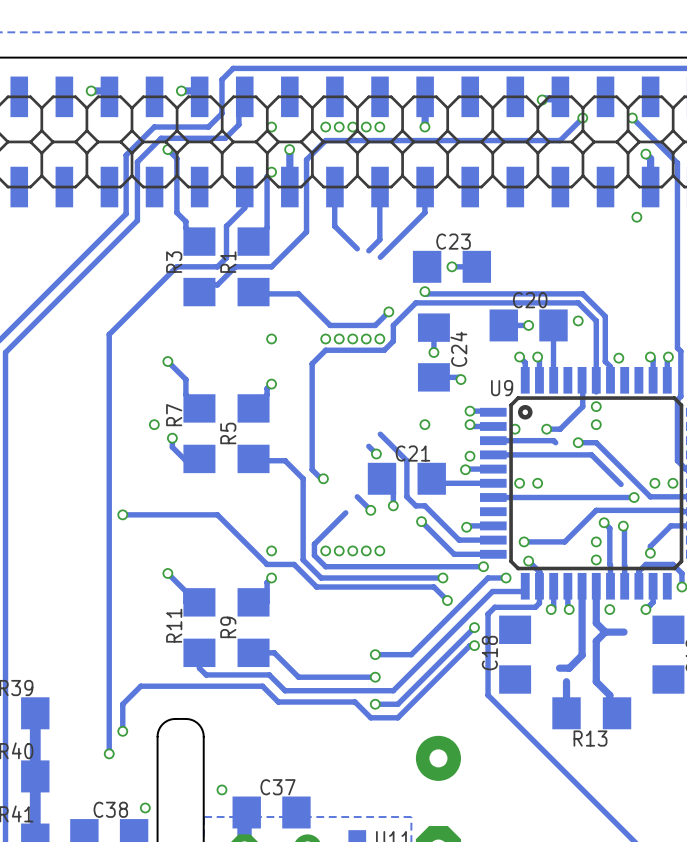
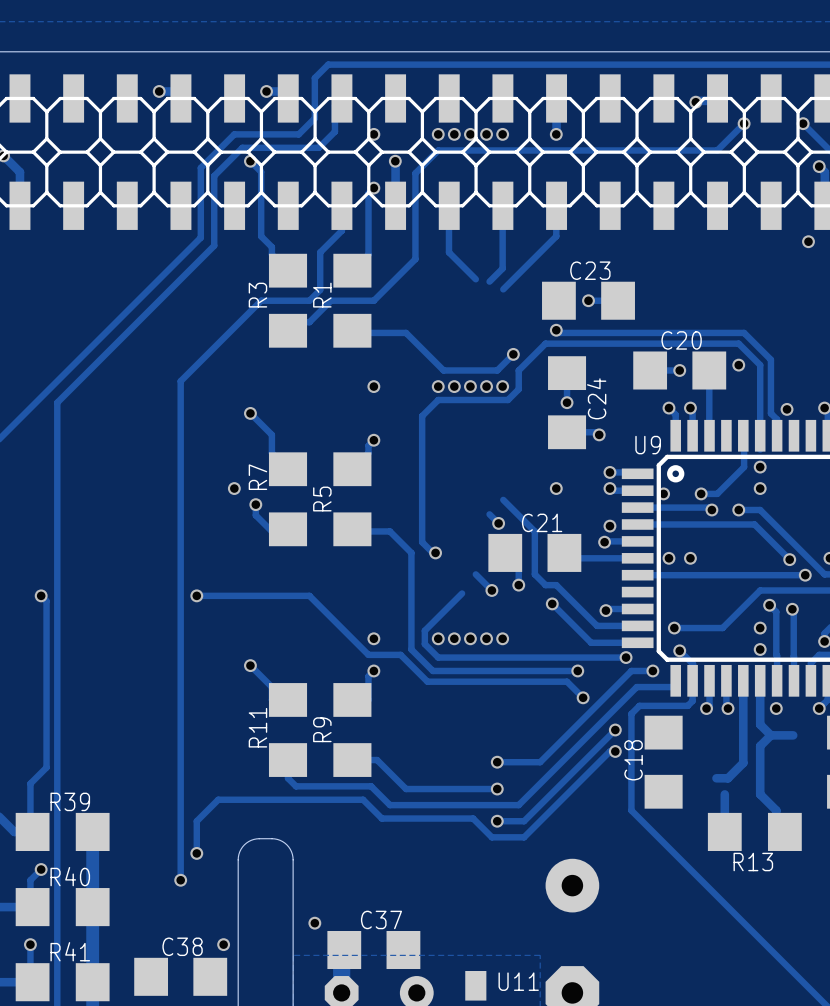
via: none -> (711, 510)
via: none -> (789, 559)

